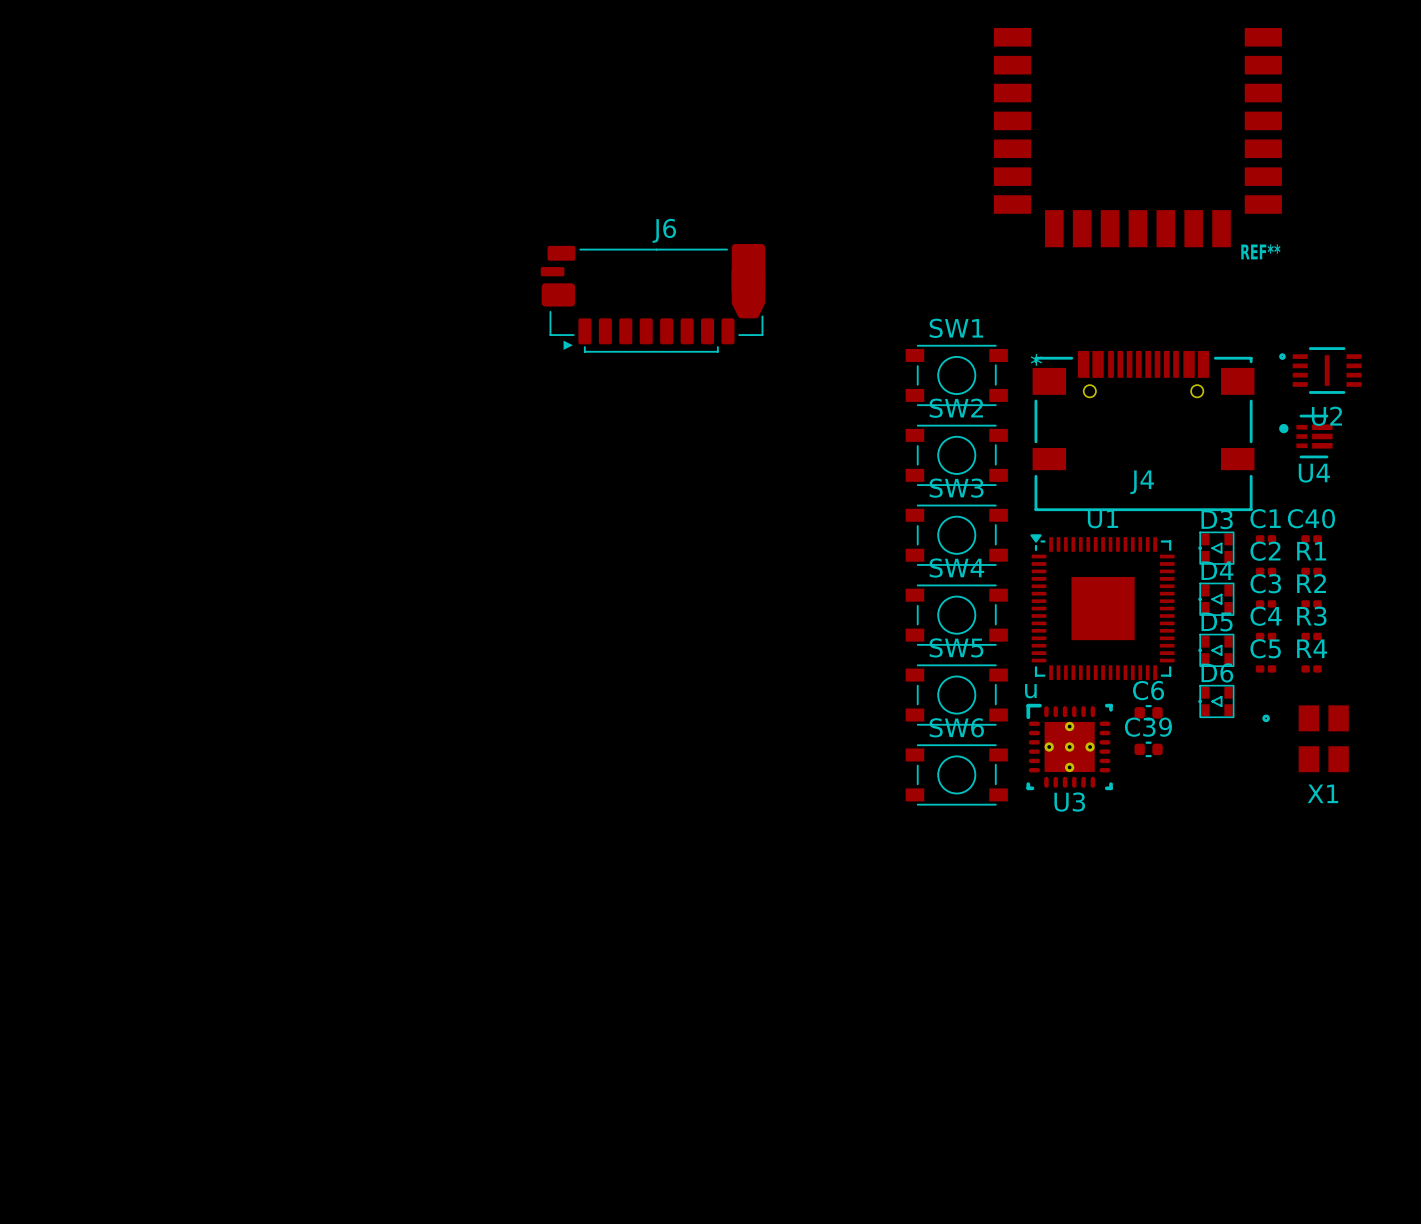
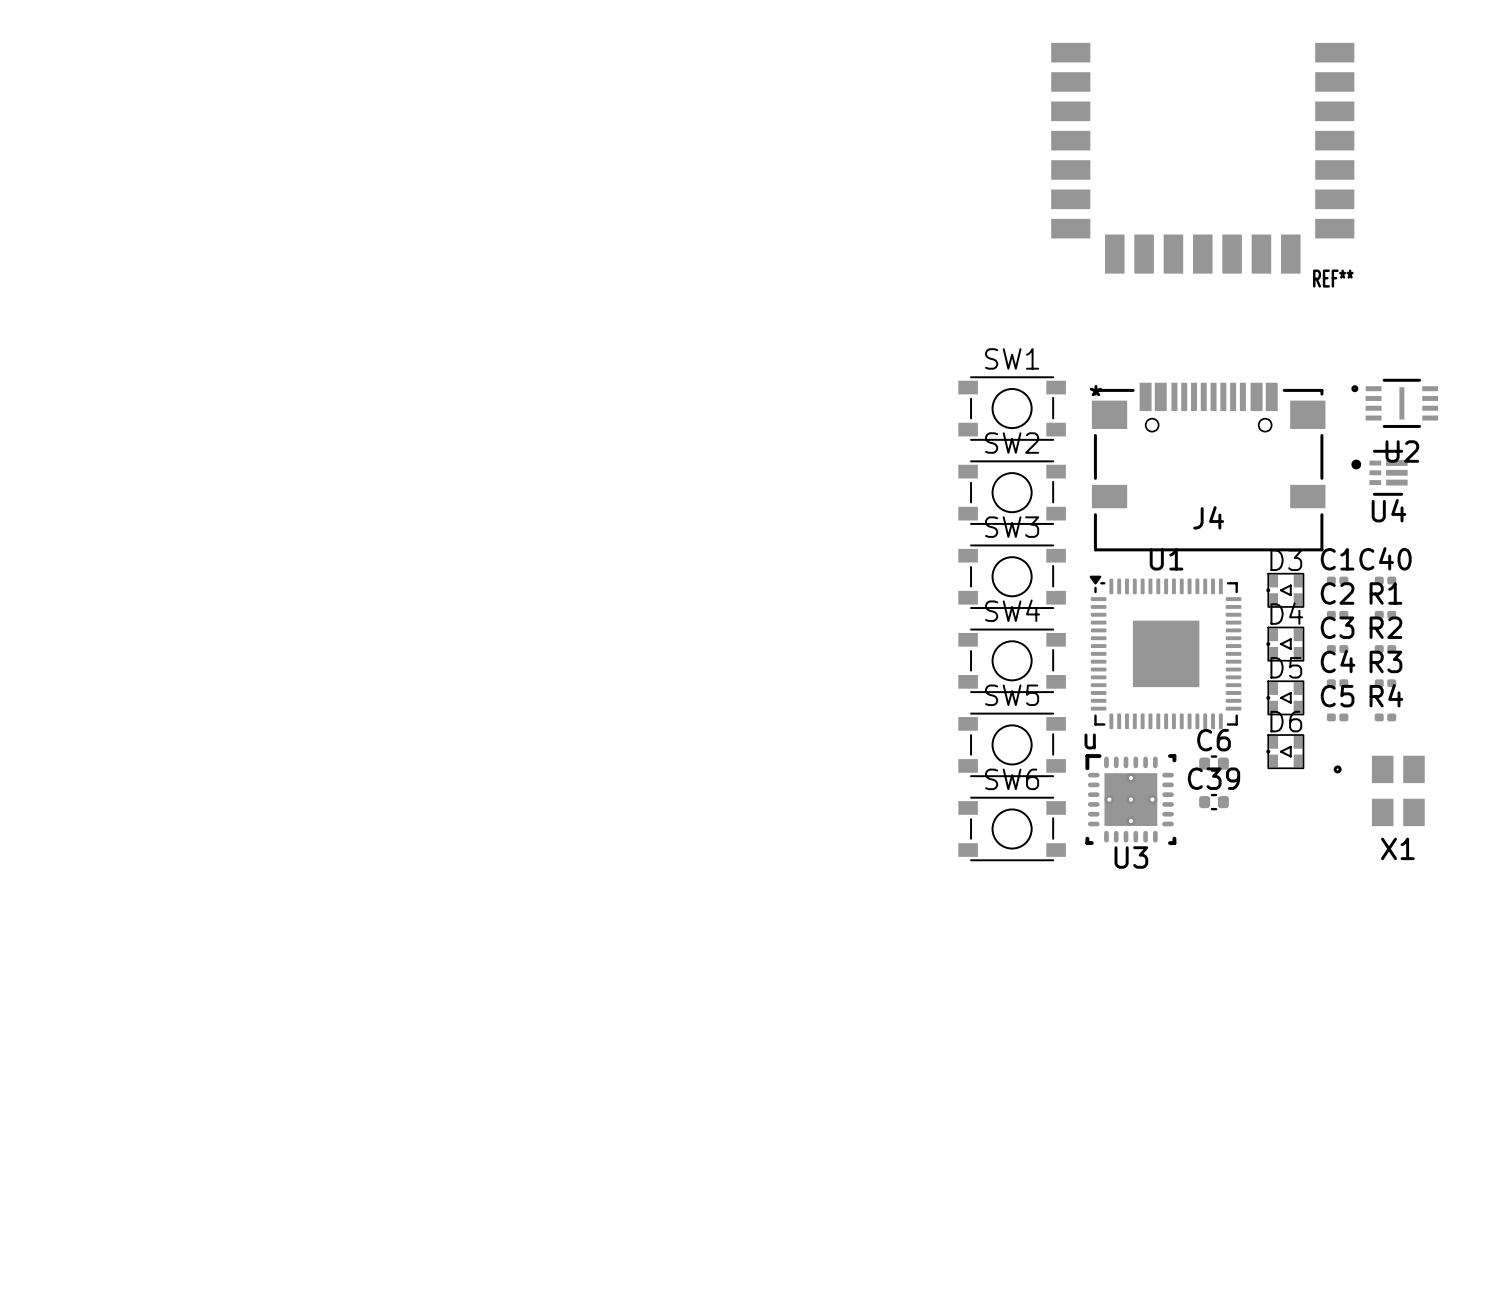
J6: (652, 298) -> none

